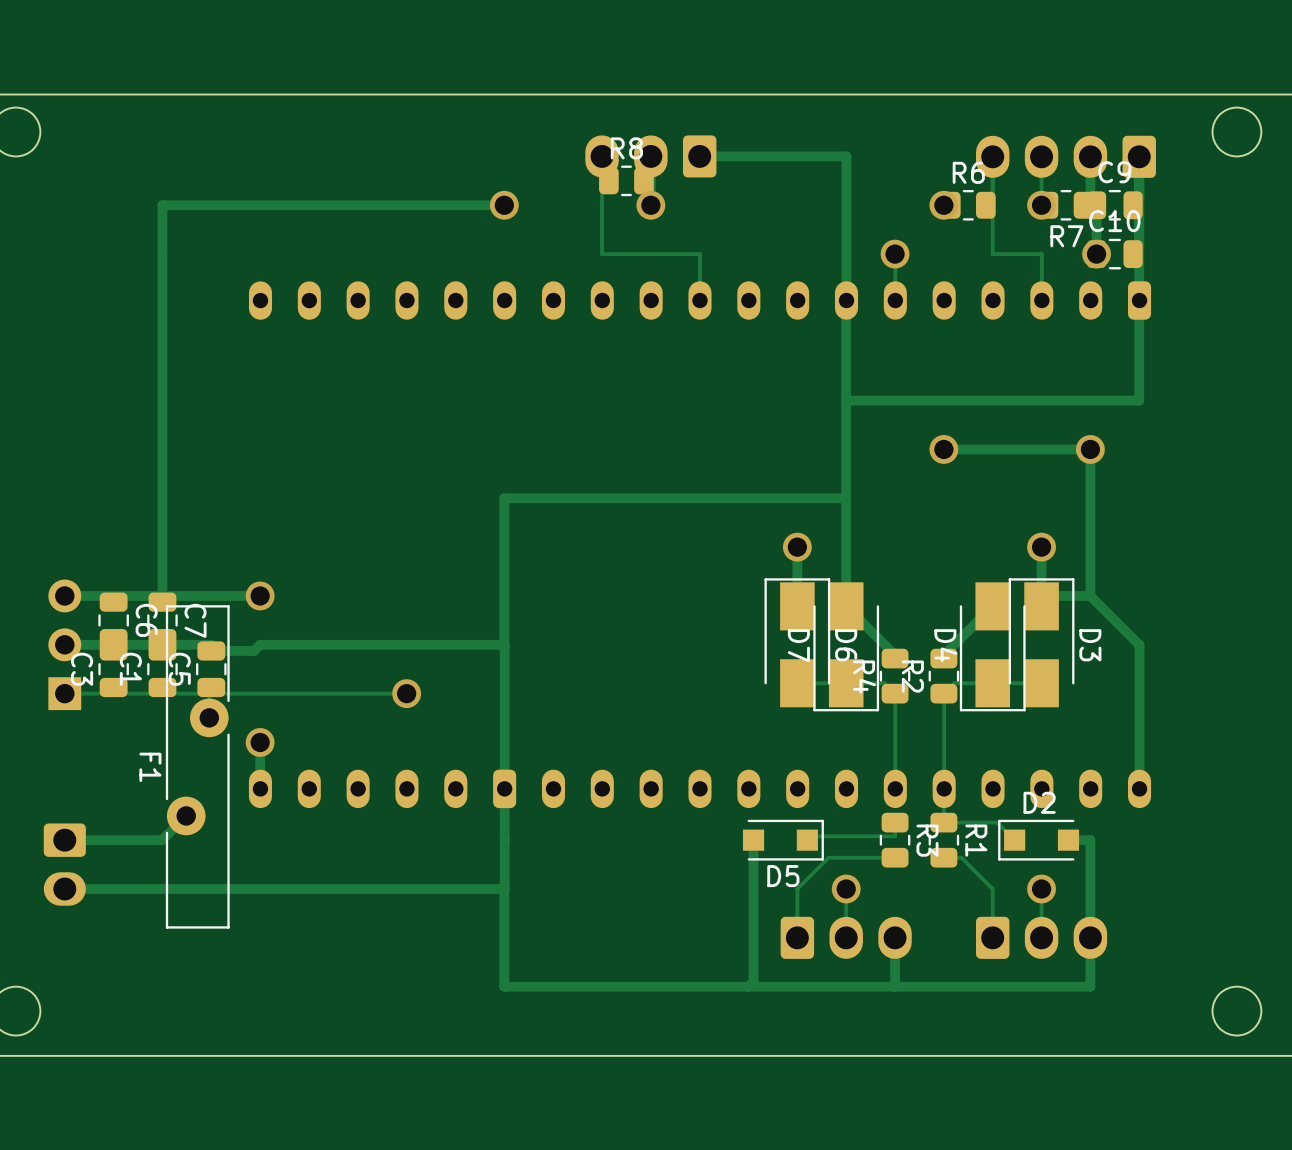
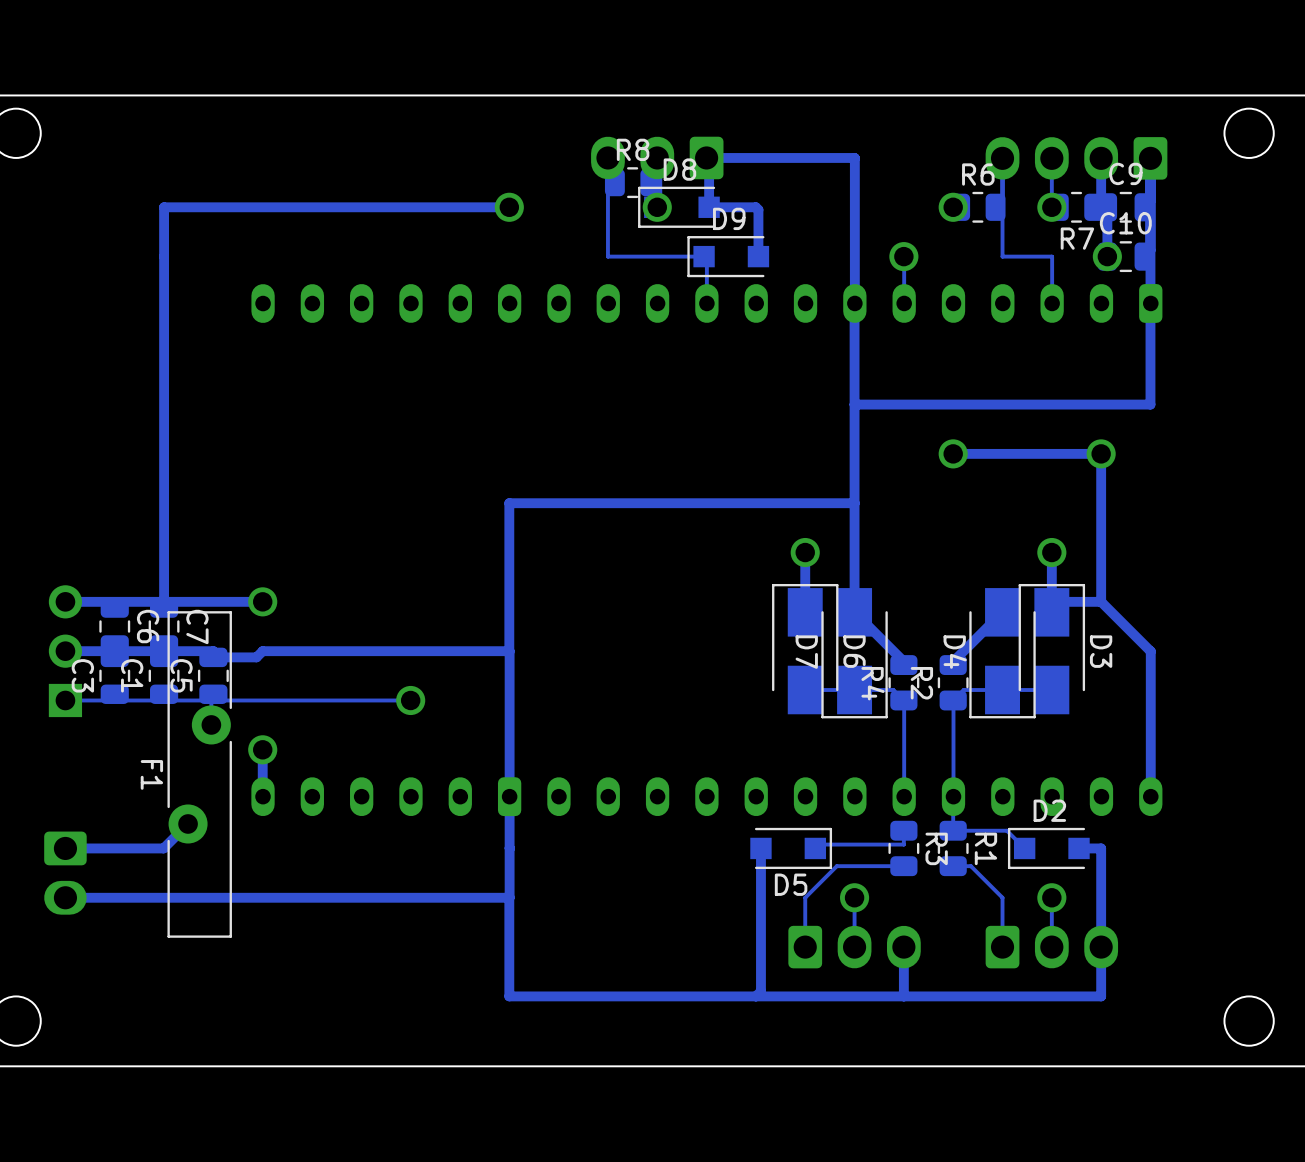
track: none -> (706, 157) (709, 160) (709, 207) (755, 207) (758, 209) (758, 256)
D8: none -> (678, 207)
D9: none -> (728, 256)

